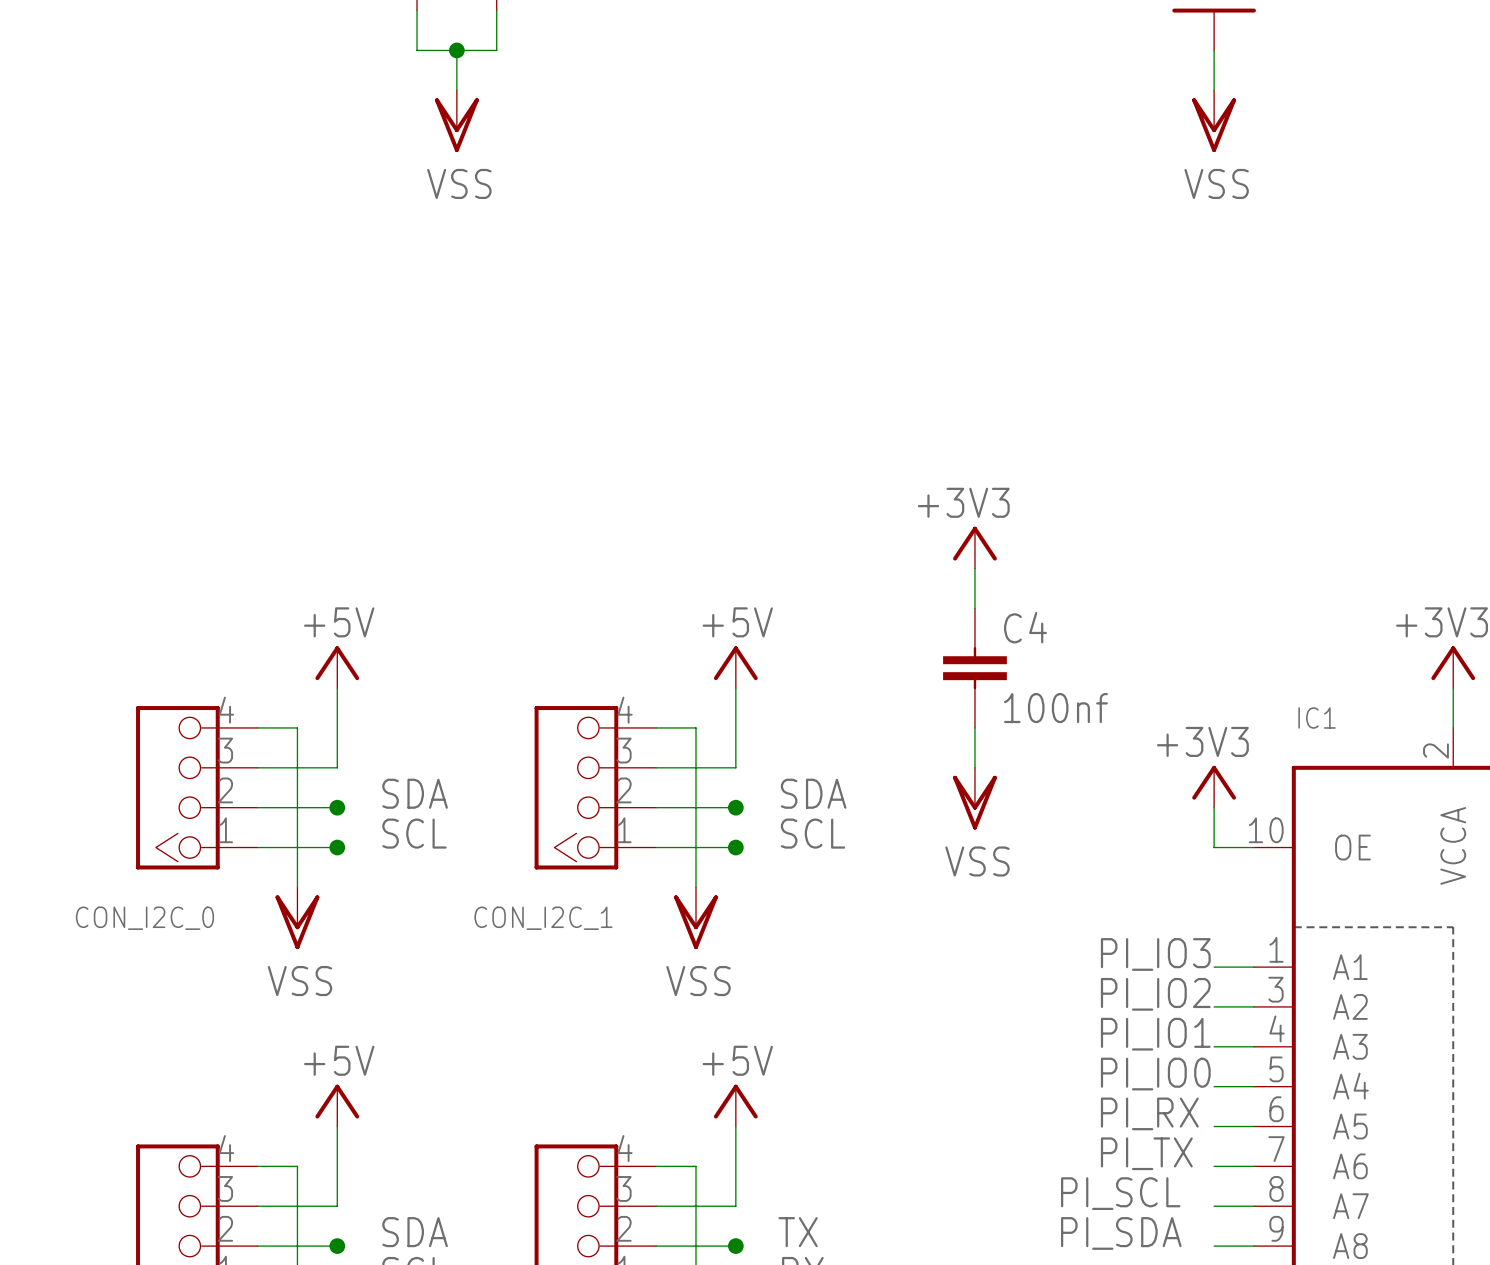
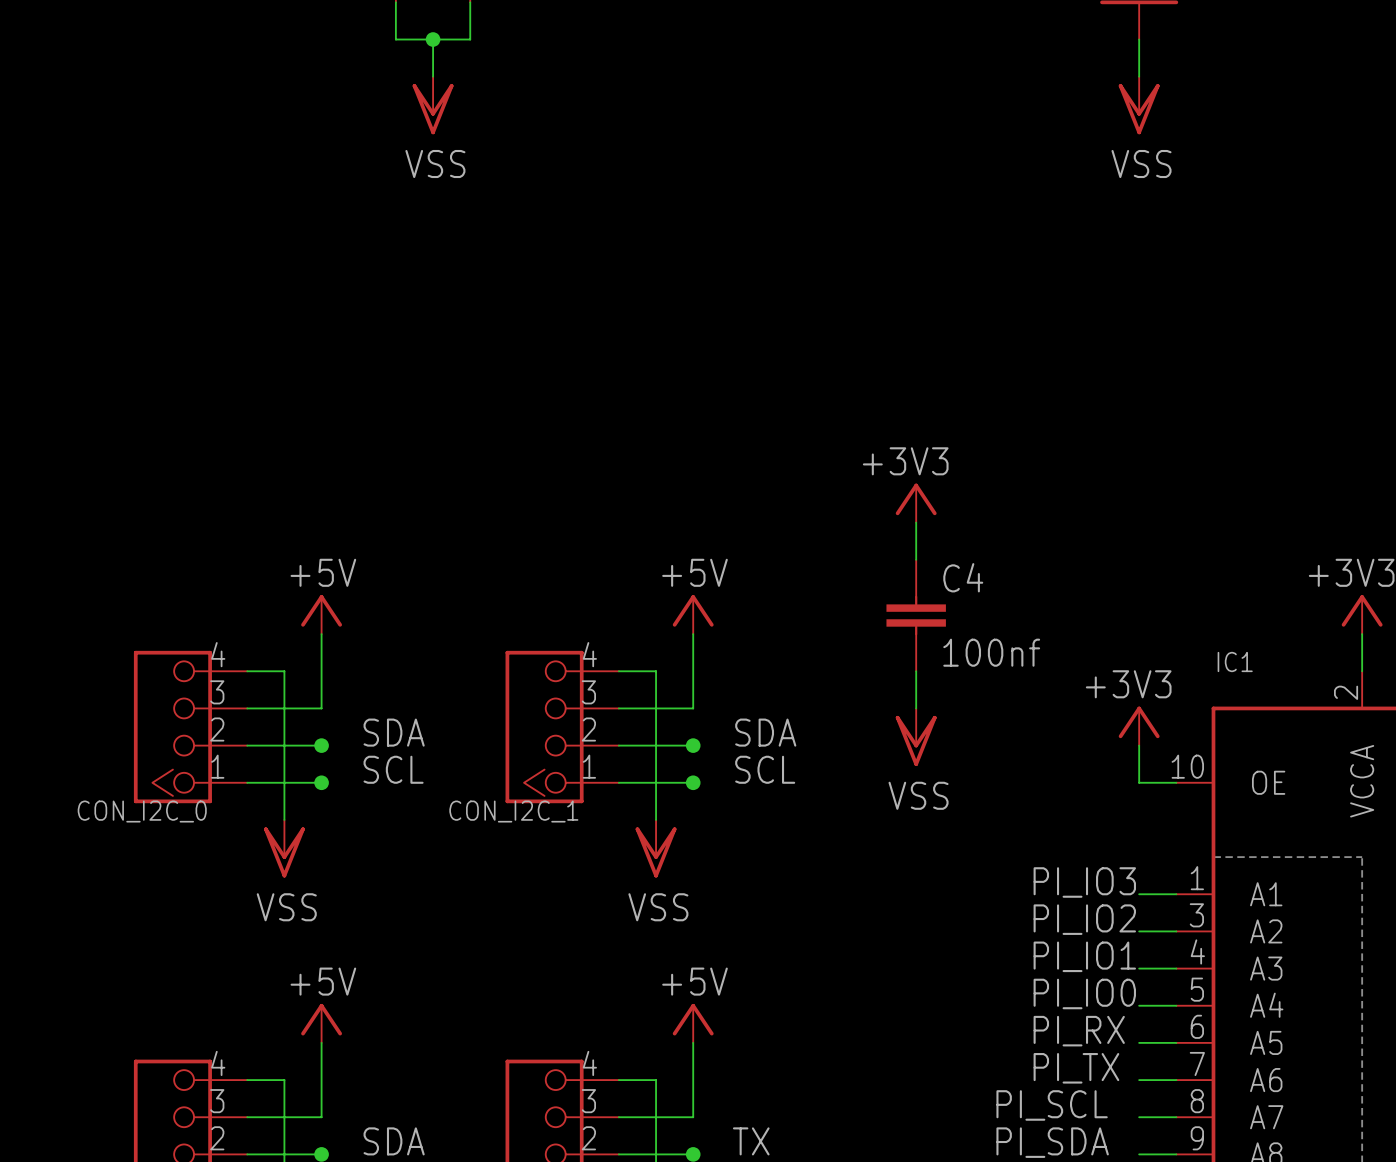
CON_I2C_0 name position: CON_I2C_0 (144, 918) -> CON_I2C_0 (142, 811)
CON_I2C_1 name position: CON_I2C_1 (543, 918) -> CON_I2C_1 (513, 811)

